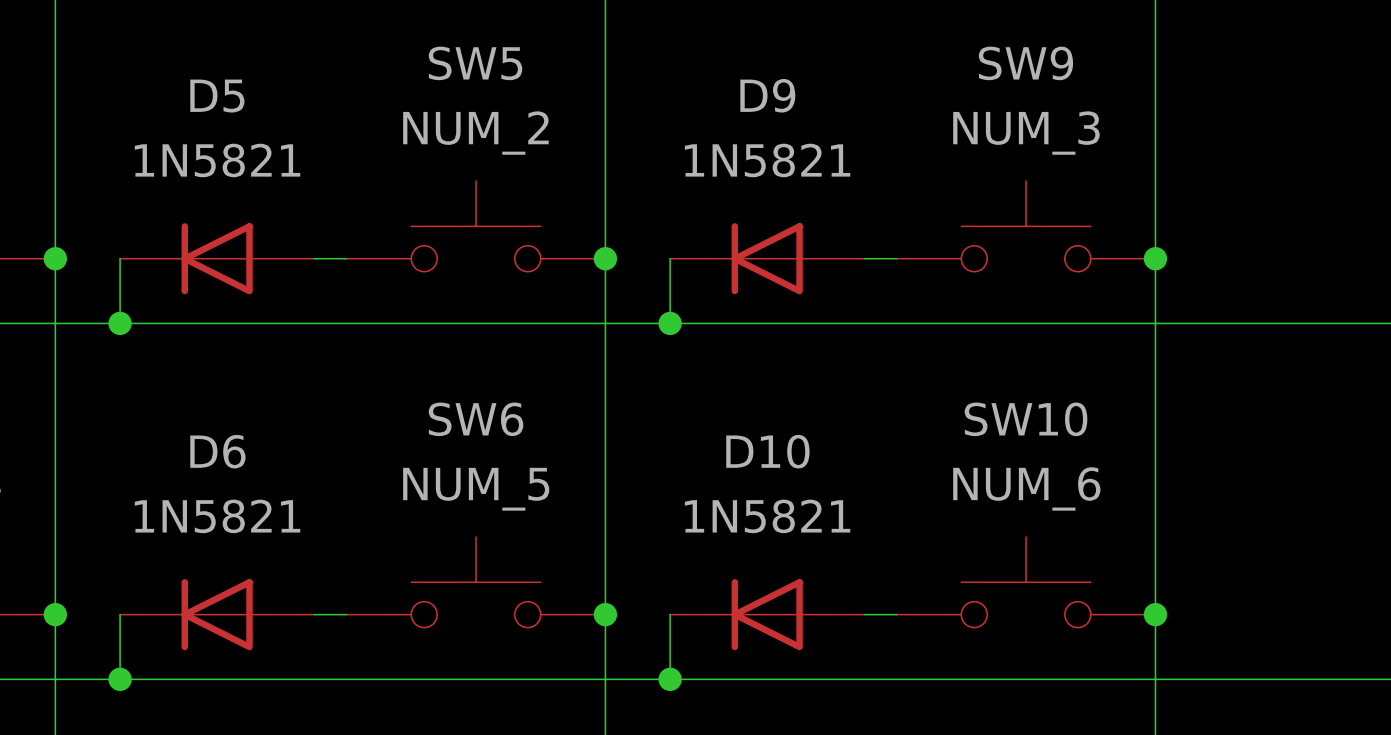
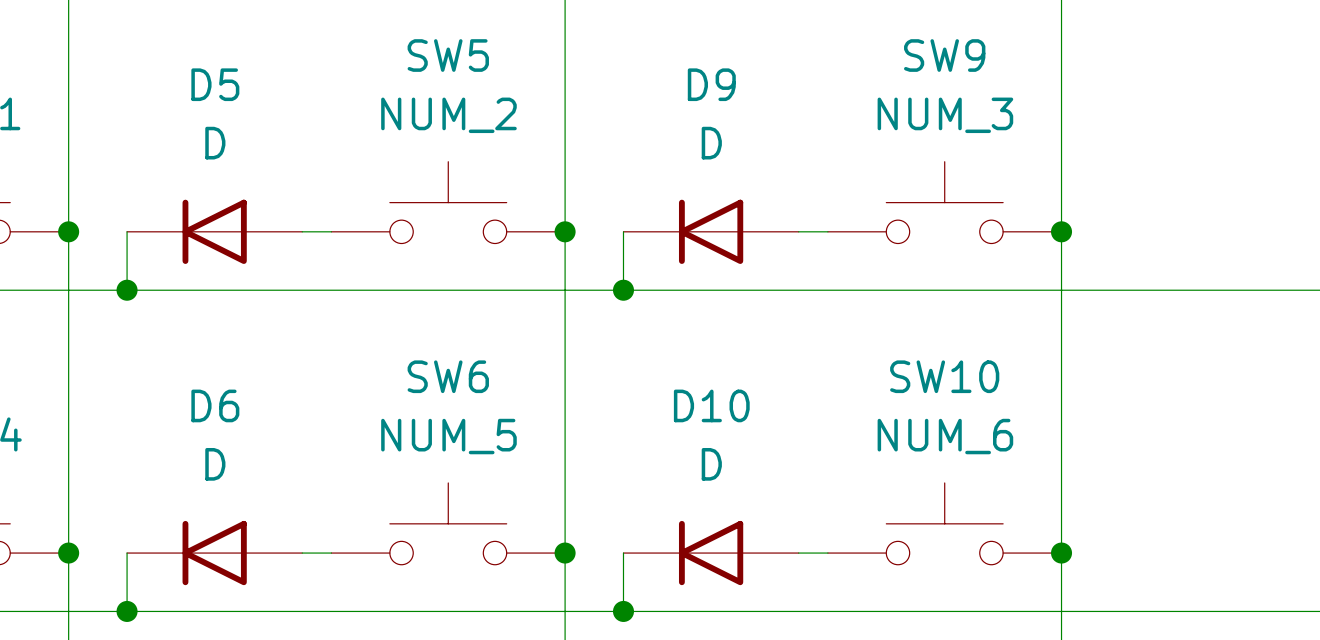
D5 value: 1N5821 (217, 160) -> D (215, 143)
D9 value: 1N5821 (767, 160) -> D (711, 143)
D6 value: 1N5821 (217, 516) -> D (215, 464)
D10 value: 1N5821 (767, 516) -> D (711, 464)

